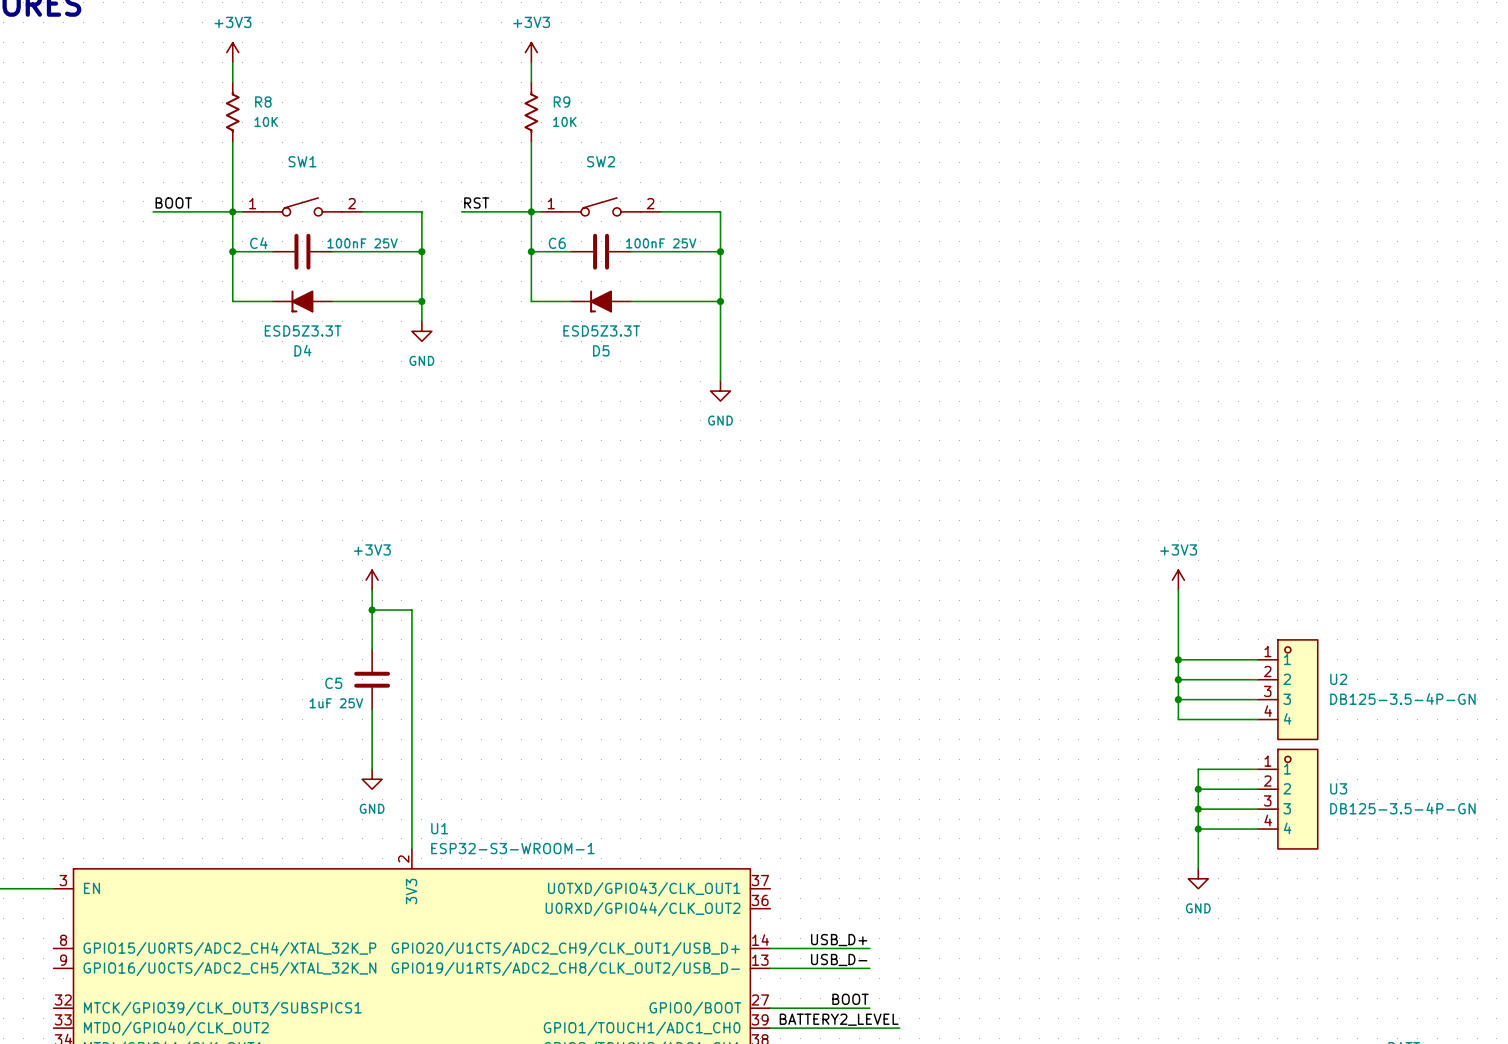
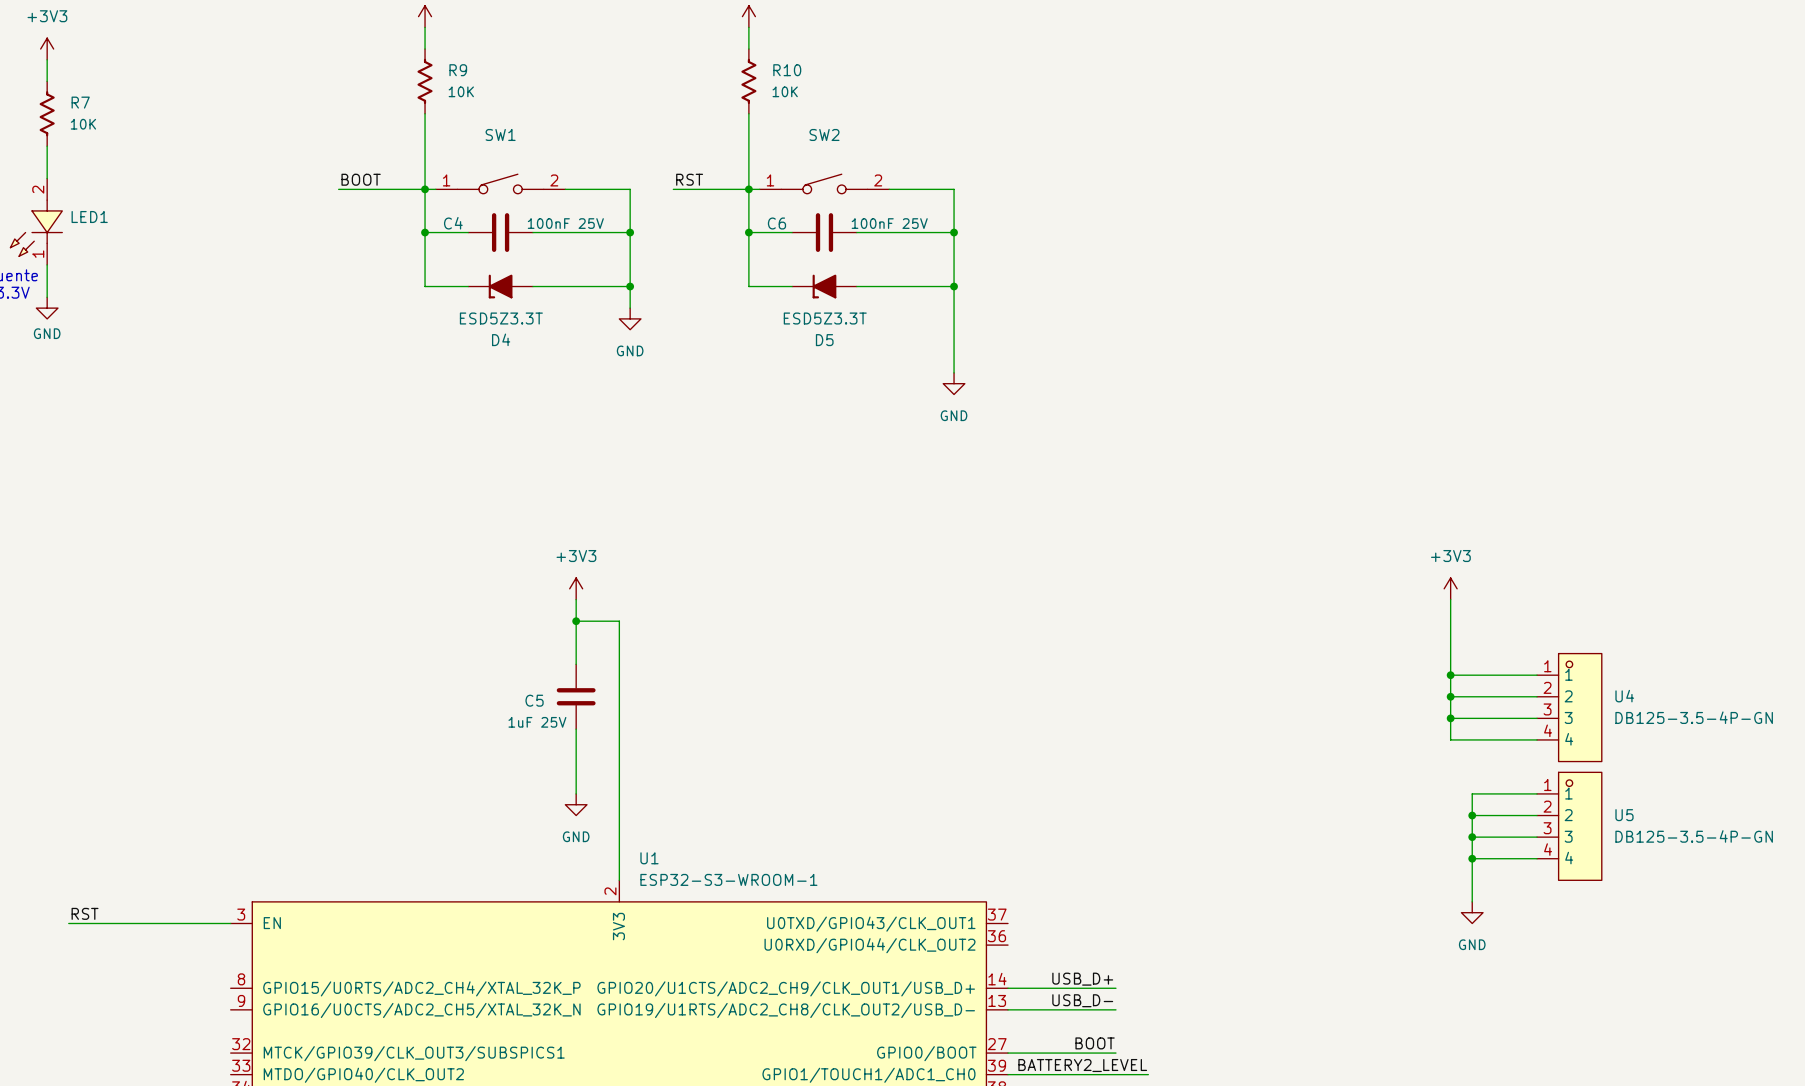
R8 name: R8 (263, 102) -> R9 (458, 70)
R9 name: R9 (562, 102) -> R10 (787, 70)
U2 name: U2 (1338, 679) -> U4 (1624, 696)
U3 name: U3 (1338, 788) -> U5 (1624, 815)

